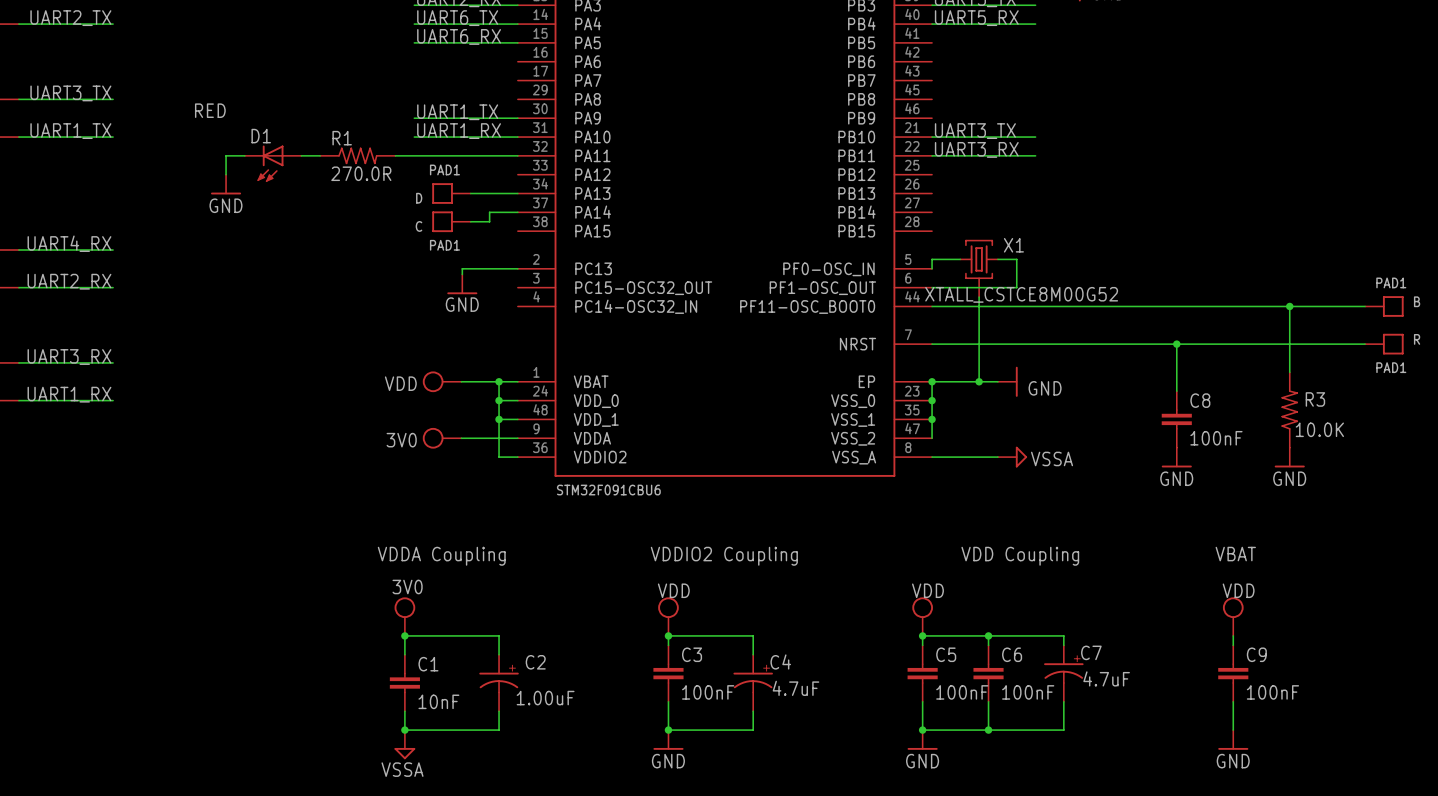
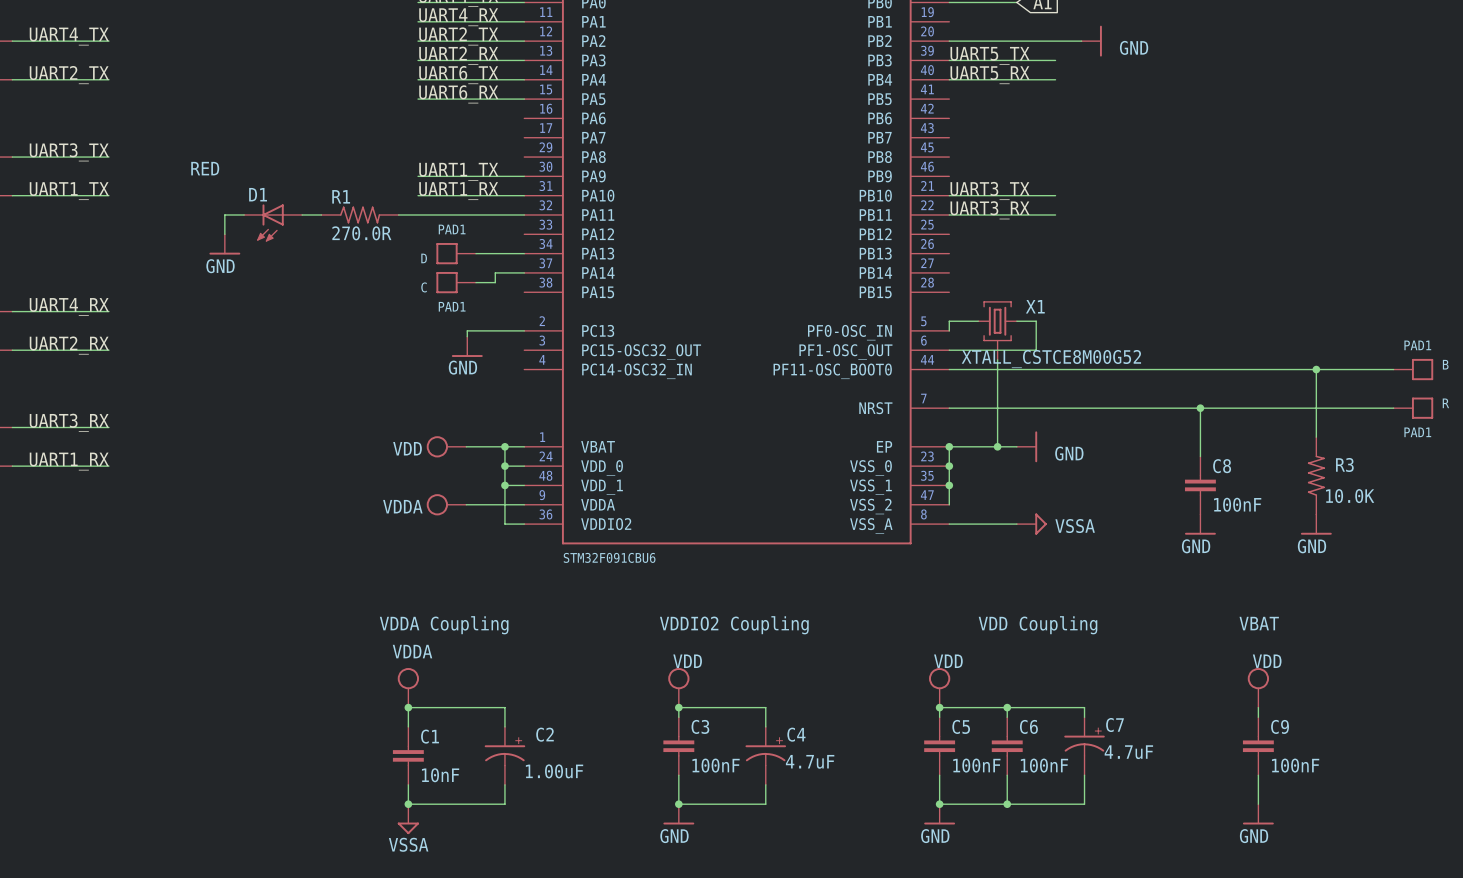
power symbol: 3V0 (442, 438) -> VDDA (446, 504)
power symbol: 3V0 (404, 616) -> VDDA (408, 687)

